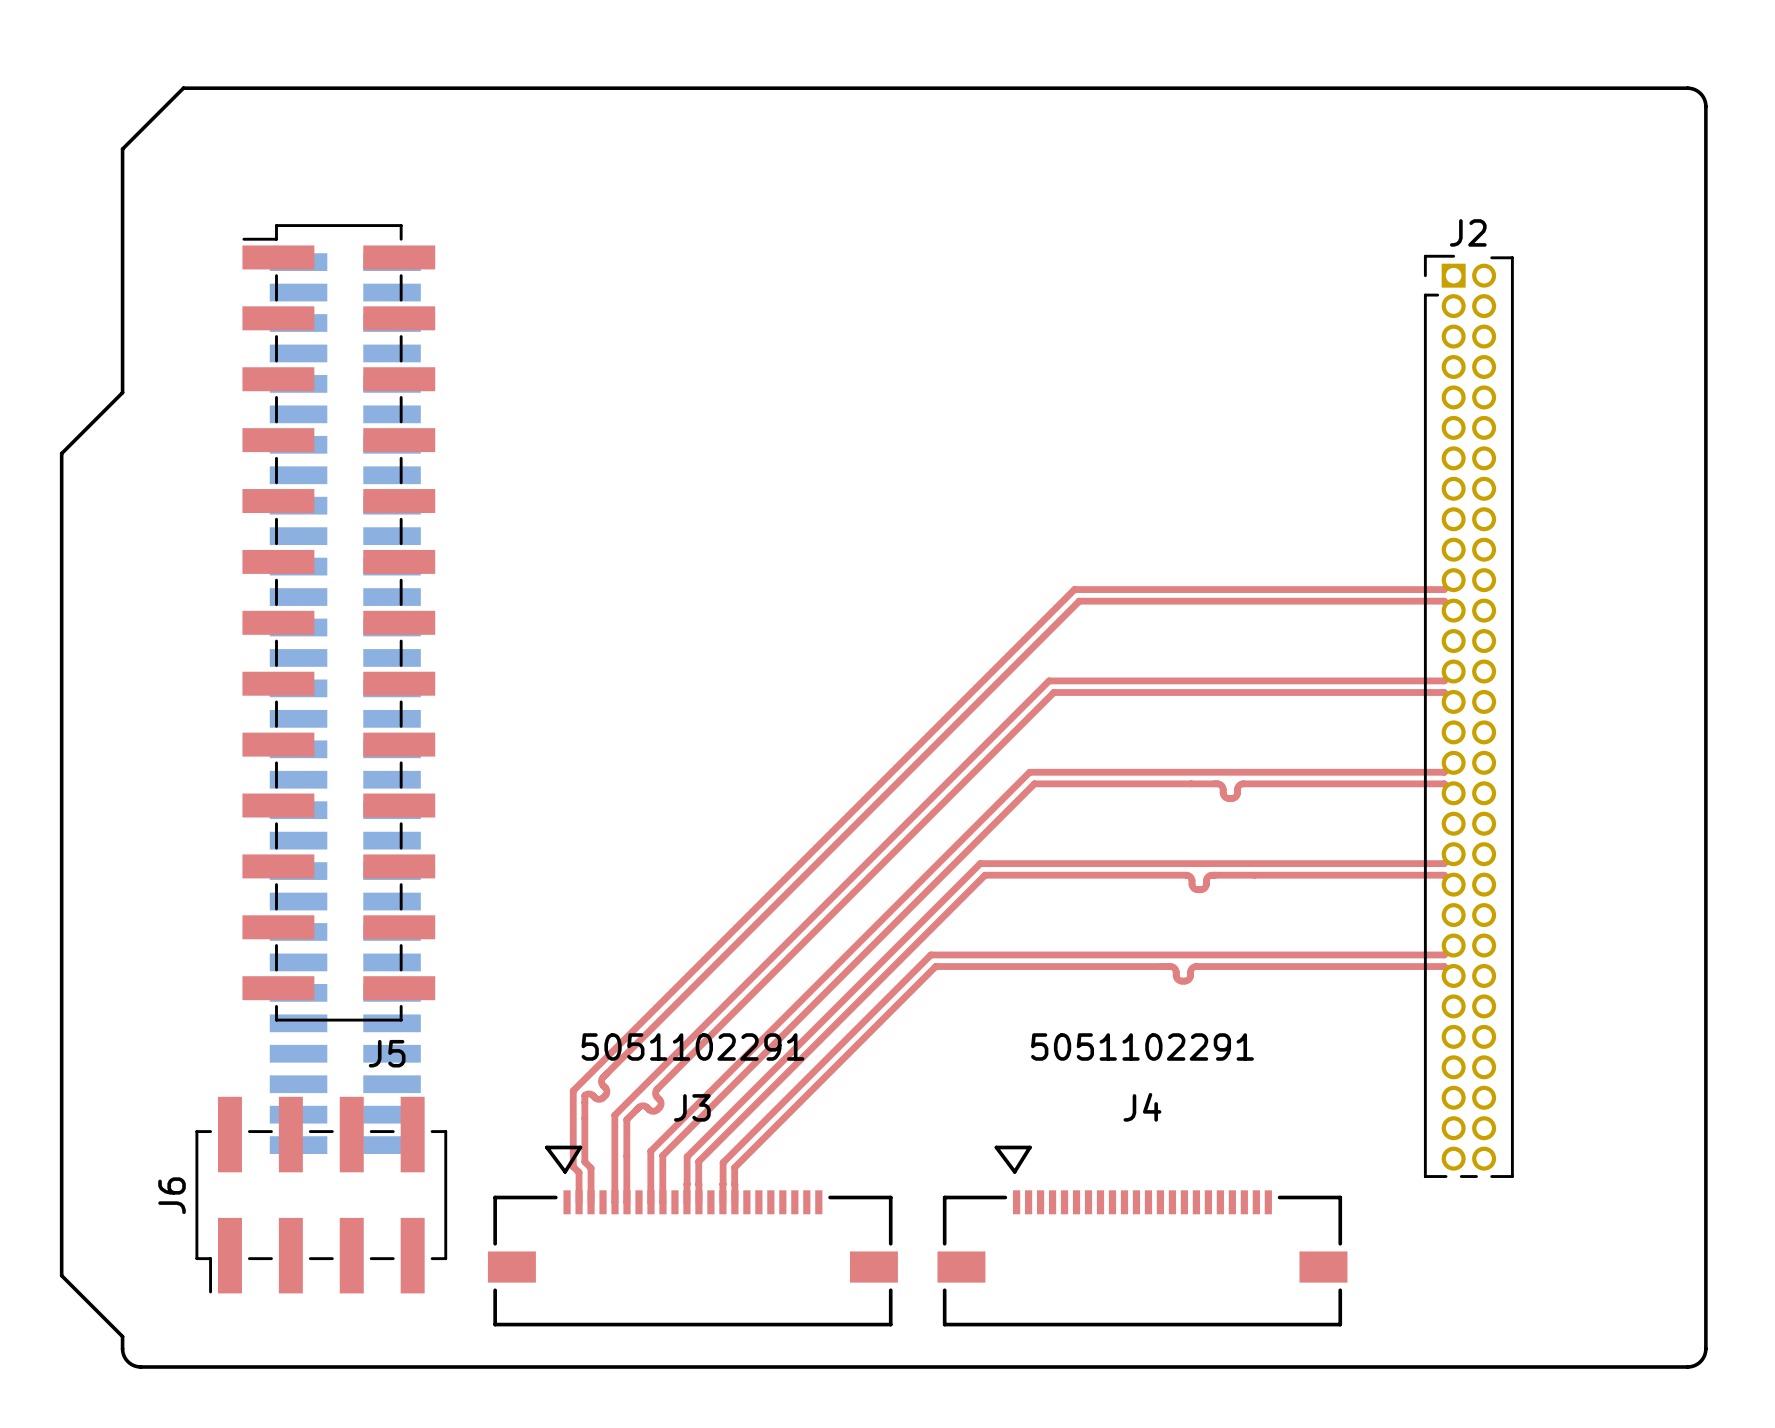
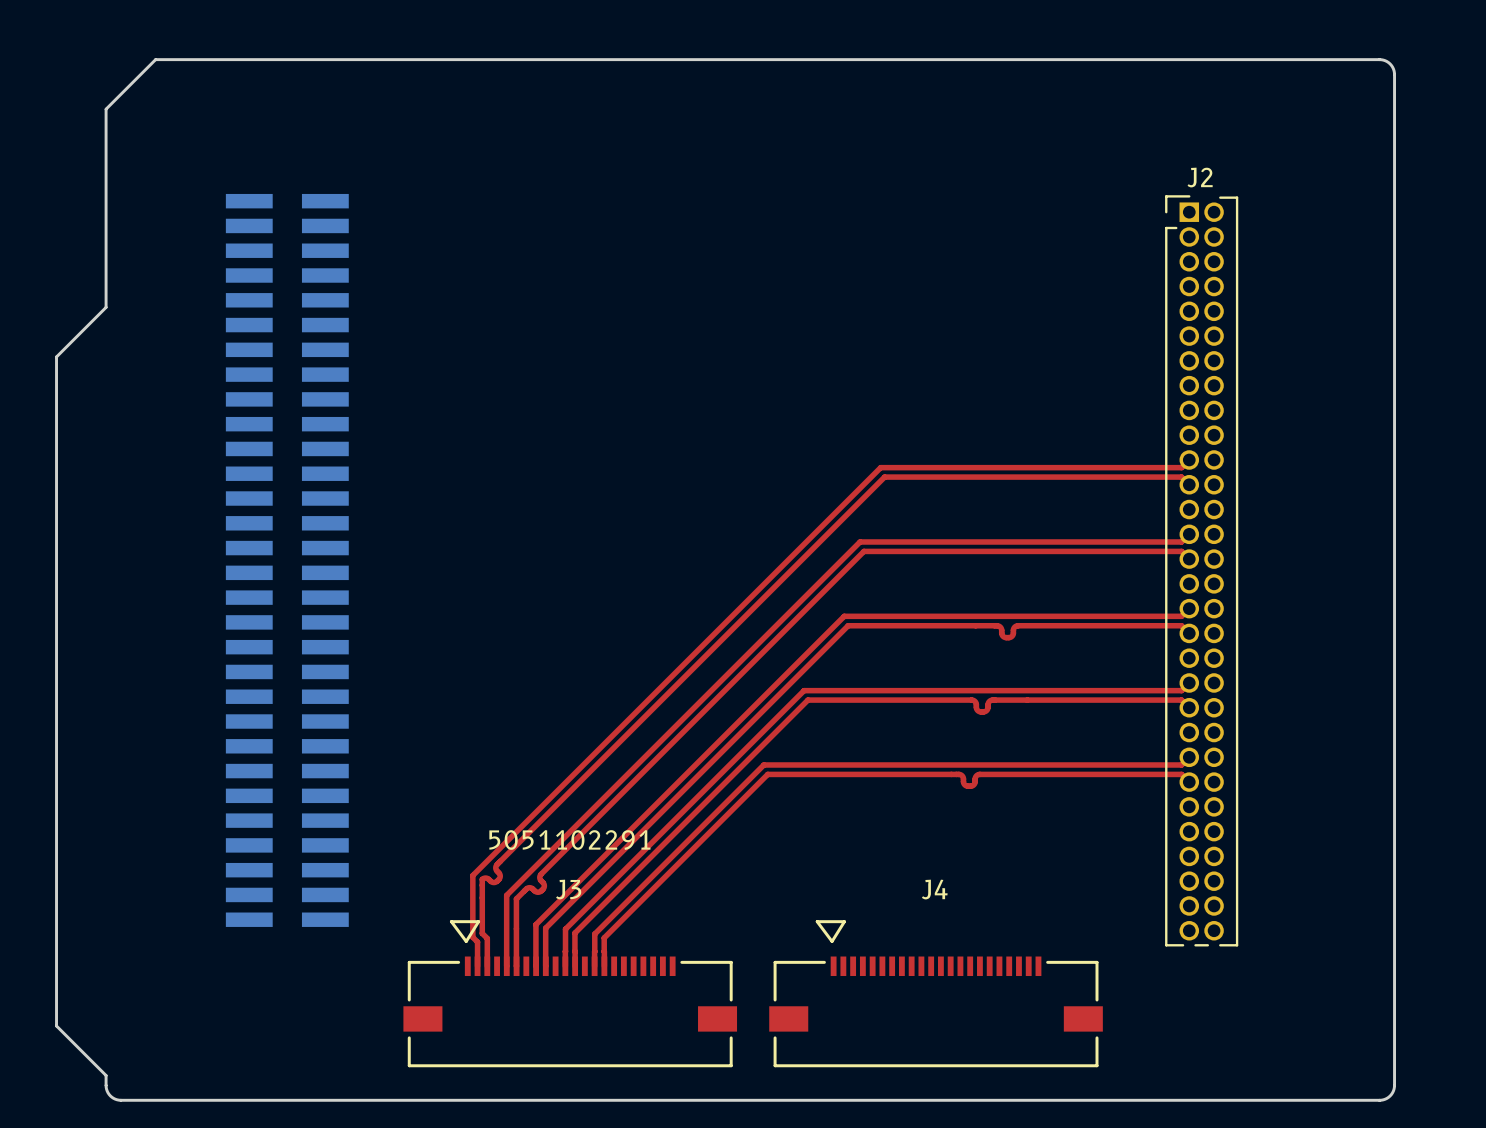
J5: (338, 622) -> none
J4 text: 5051102291 (1142, 1047) -> none
J6: (321, 1195) -> none

